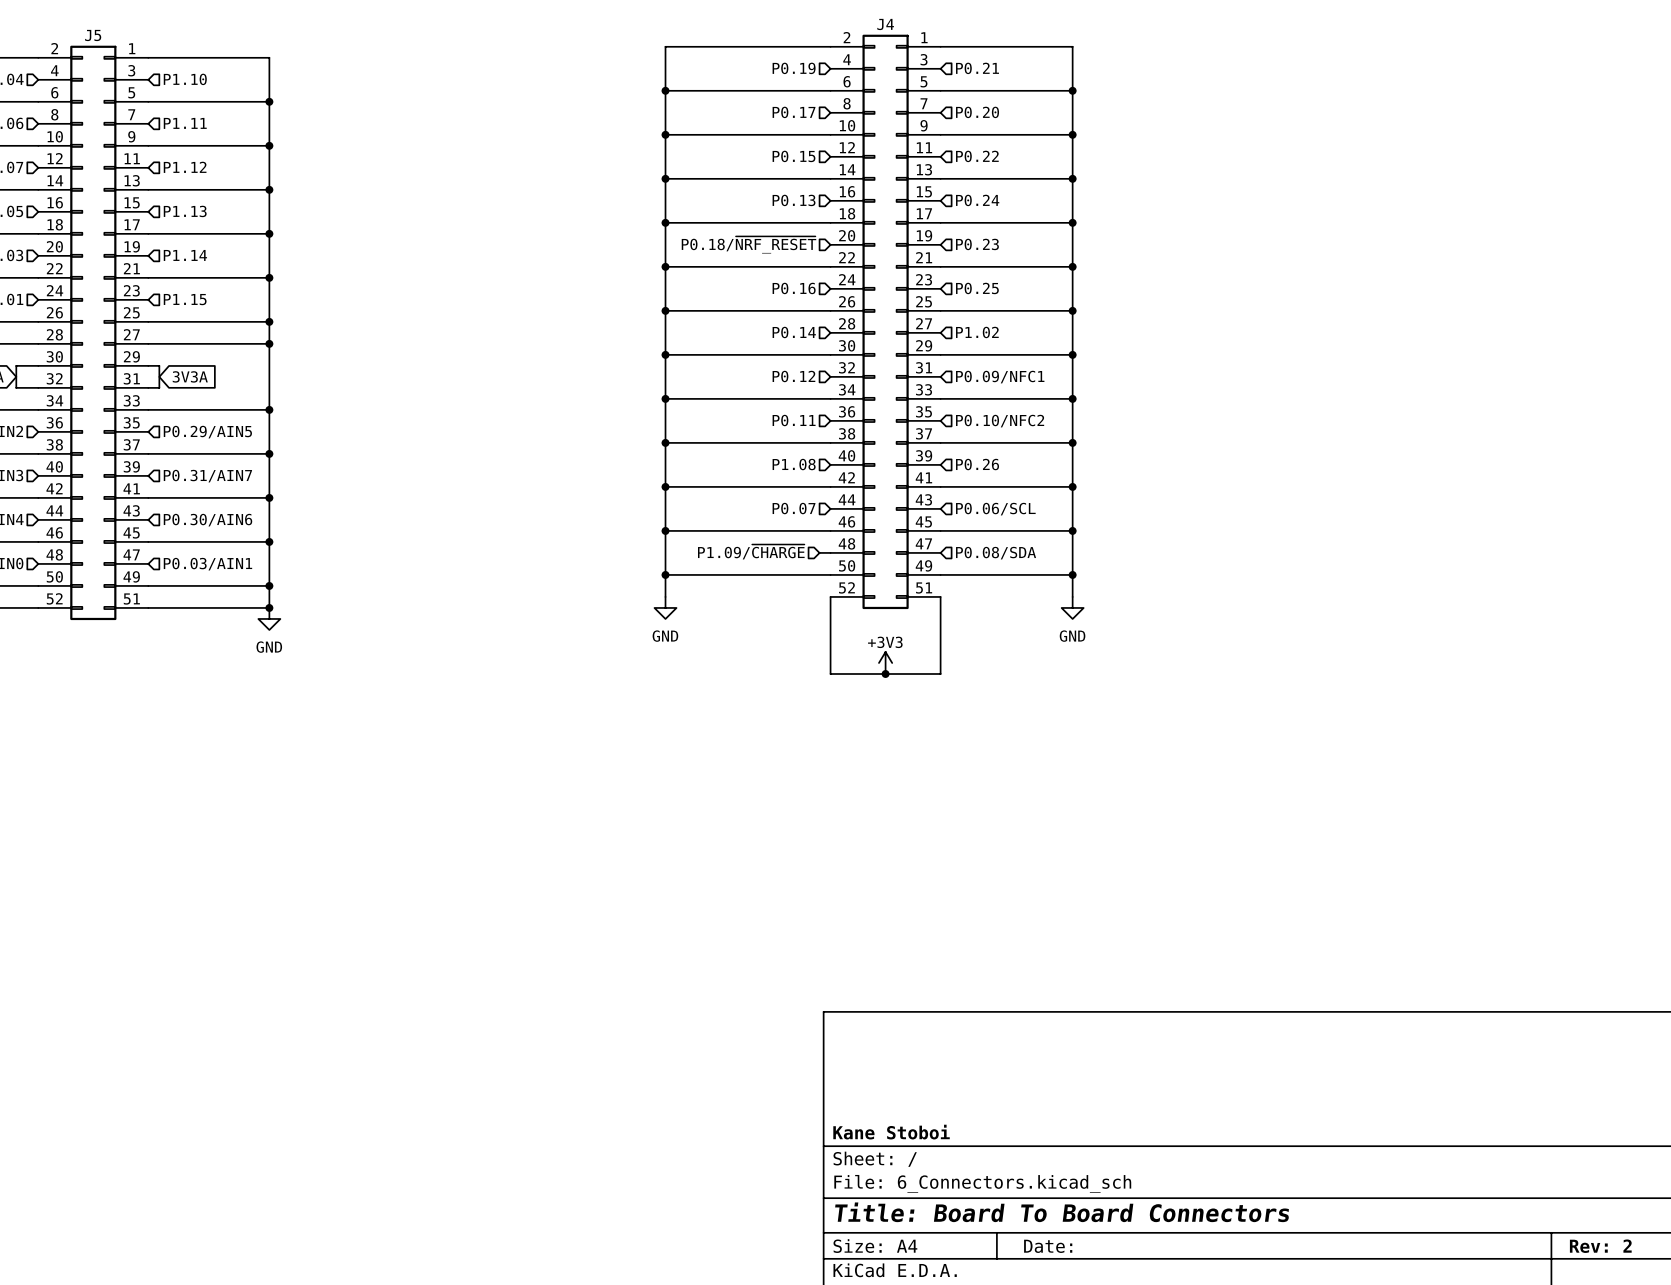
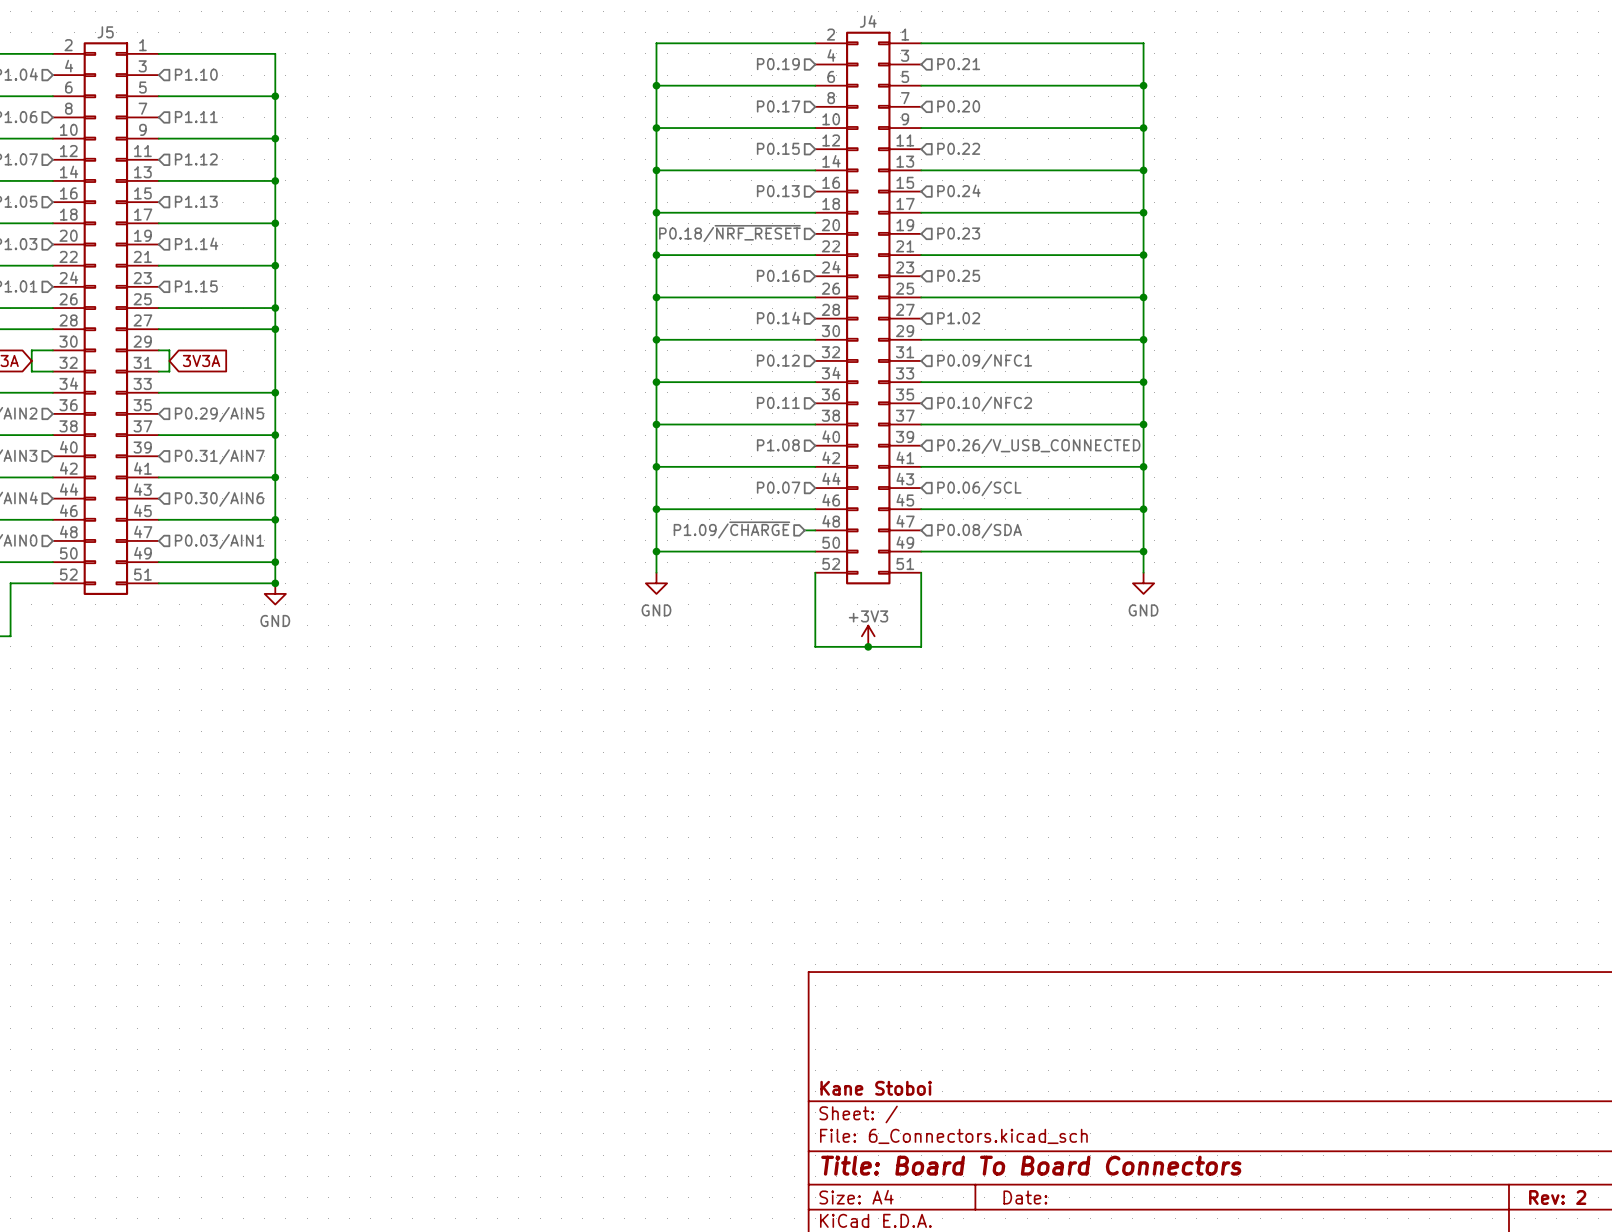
wire: (1072, 46) (1072, 596) -> (1048, 43) (1143, 43) (1143, 572)
wire: none -> (1048, 85) (1143, 85)
junction: (1072, 90) -> none
junction: none -> (1143, 85)
wire: none -> (1048, 128) (1143, 128)
junction: (1072, 134) -> none
junction: none -> (1143, 128)
wire: none -> (1048, 170) (1143, 170)
junction: (1072, 178) -> none
junction: none -> (1143, 170)
wire: none -> (1048, 212) (1143, 212)
junction: (1072, 222) -> none
junction: none -> (1143, 212)
wire: none -> (1048, 255) (1143, 255)
junction: (1072, 266) -> none
junction: none -> (1143, 255)
wire: none -> (1048, 297) (1143, 297)
junction: (1072, 310) -> none
junction: none -> (1143, 297)
wire: none -> (1048, 339) (1143, 339)
junction: (1072, 354) -> none
junction: none -> (1143, 339)
wire: none -> (1048, 382) (1143, 382)
junction: (1072, 398) -> none
junction: none -> (1143, 382)
wire: none -> (1048, 424) (1143, 424)
junction: (1072, 442) -> none
junction: none -> (1143, 424)
hierarchical label: P0.26 (977, 464) -> P0.26/V_USB_CONNECTED (1038, 446)
wire: none -> (1048, 466) (1143, 466)
junction: (1072, 486) -> none
junction: none -> (1143, 466)
wire: none -> (1048, 509) (1143, 509)
junction: (1072, 530) -> none
junction: none -> (1143, 509)
wire: none -> (1048, 551) (1143, 551)
junction: (1072, 574) -> none
junction: none -> (1143, 551)
power symbol position: GND (1072, 607) -> GND (1143, 583)

